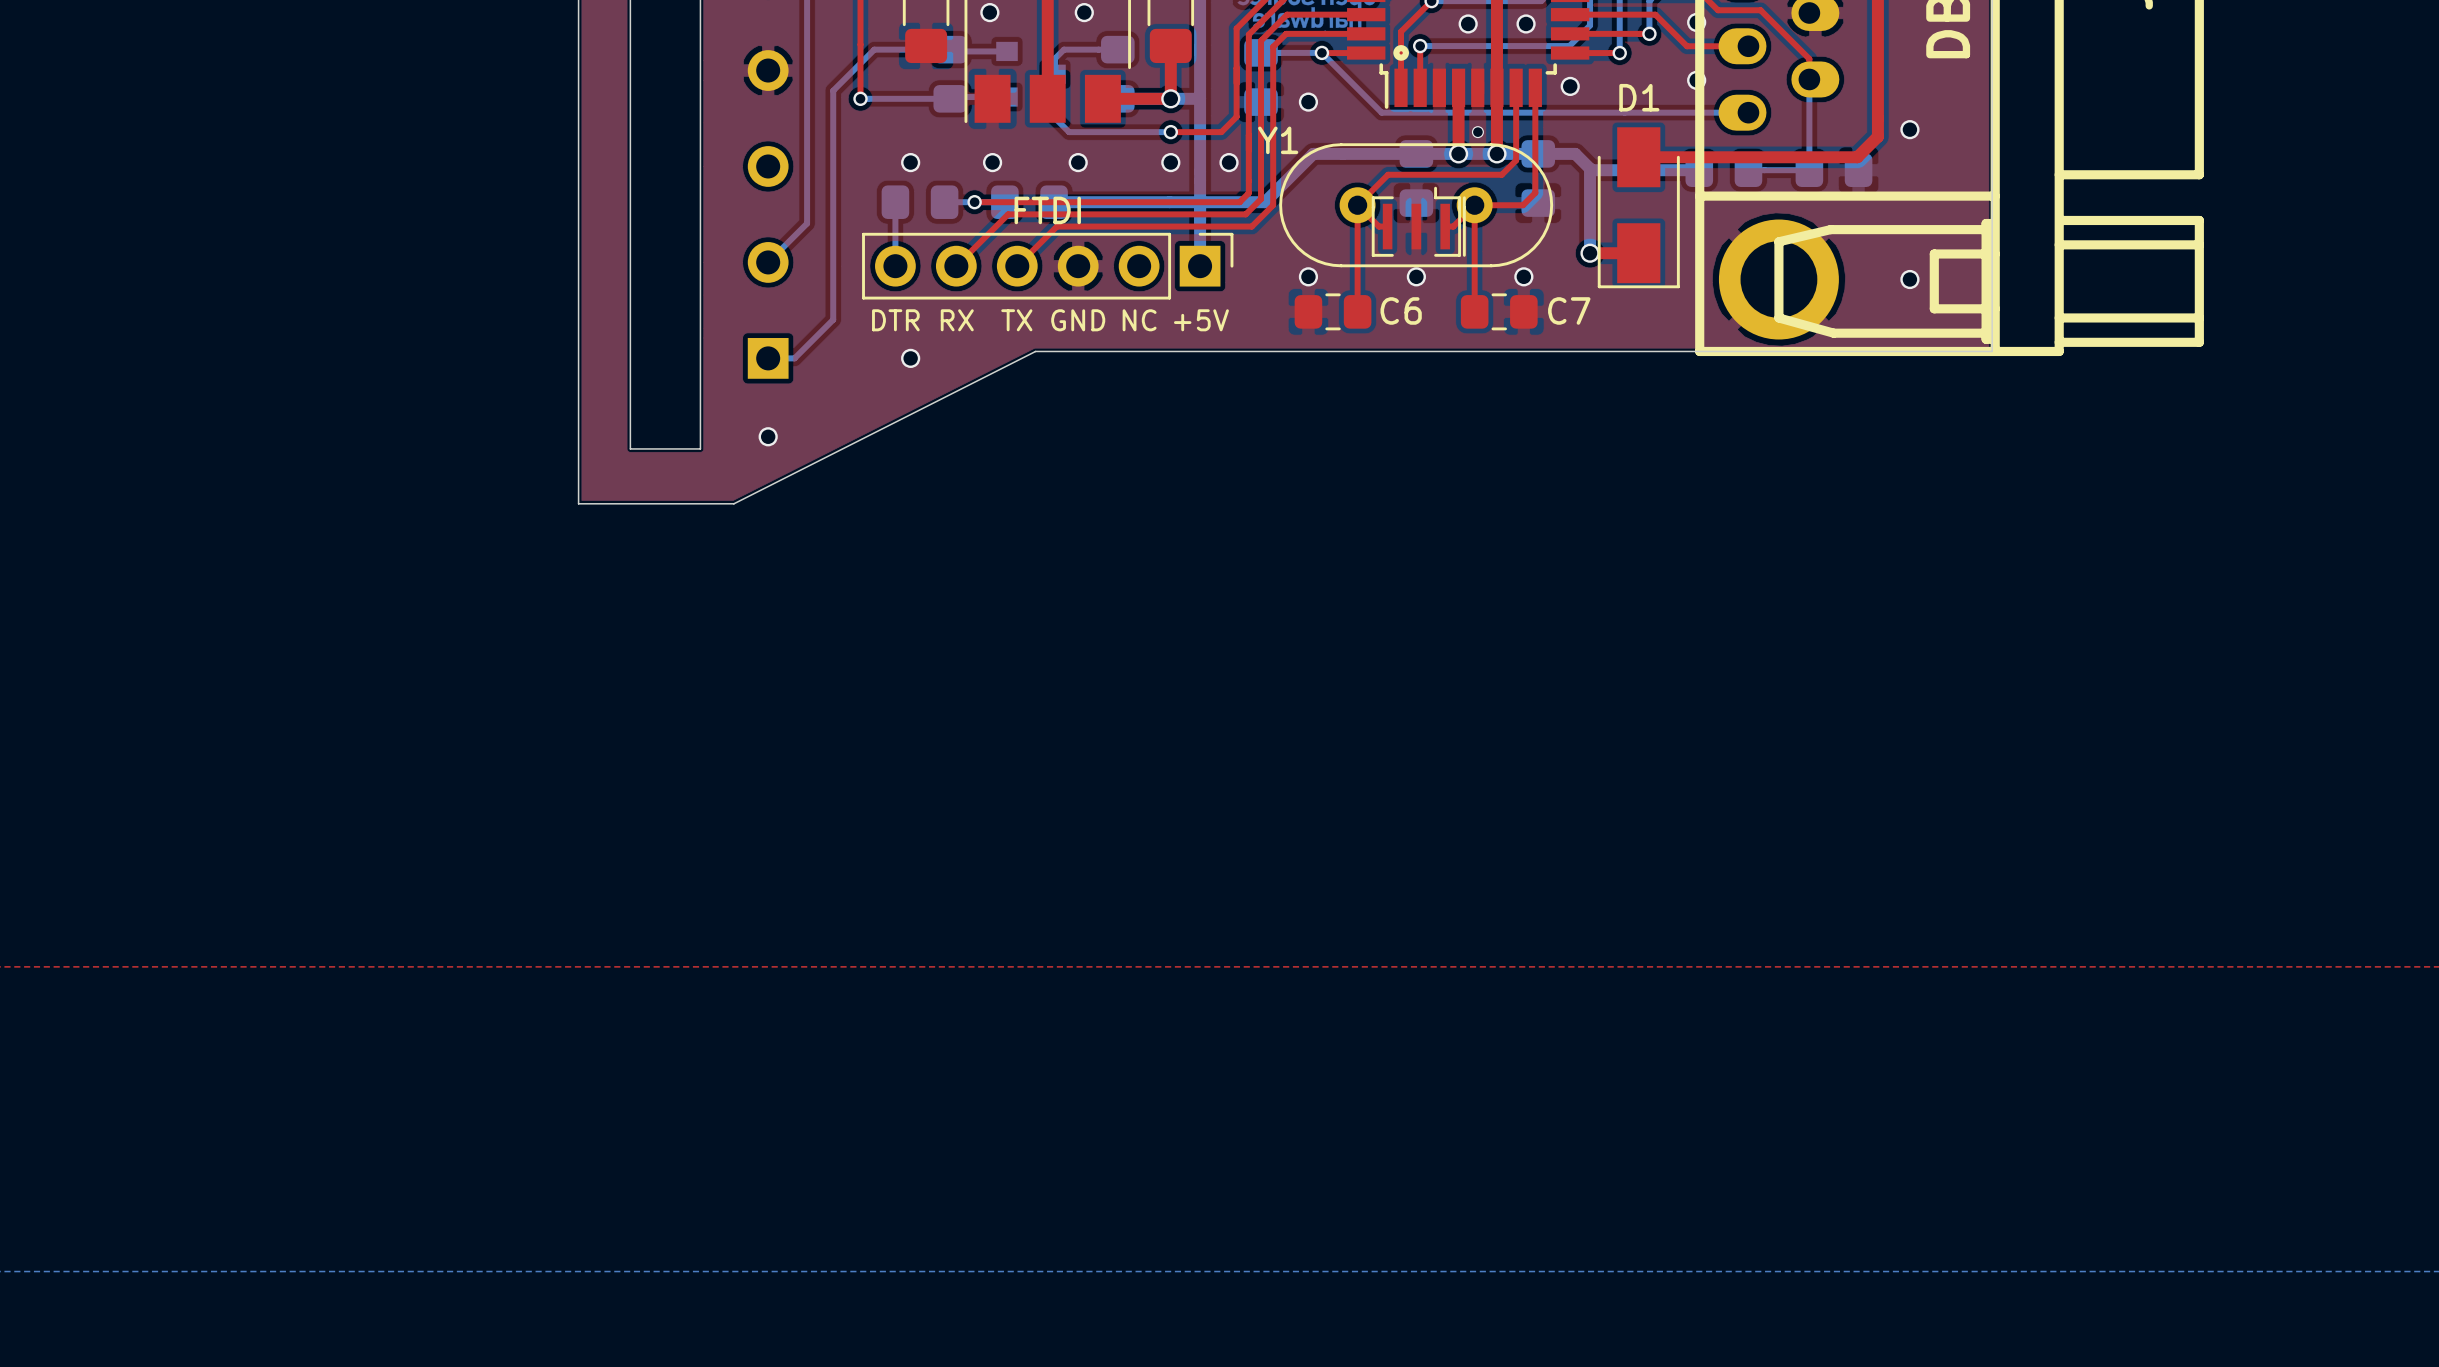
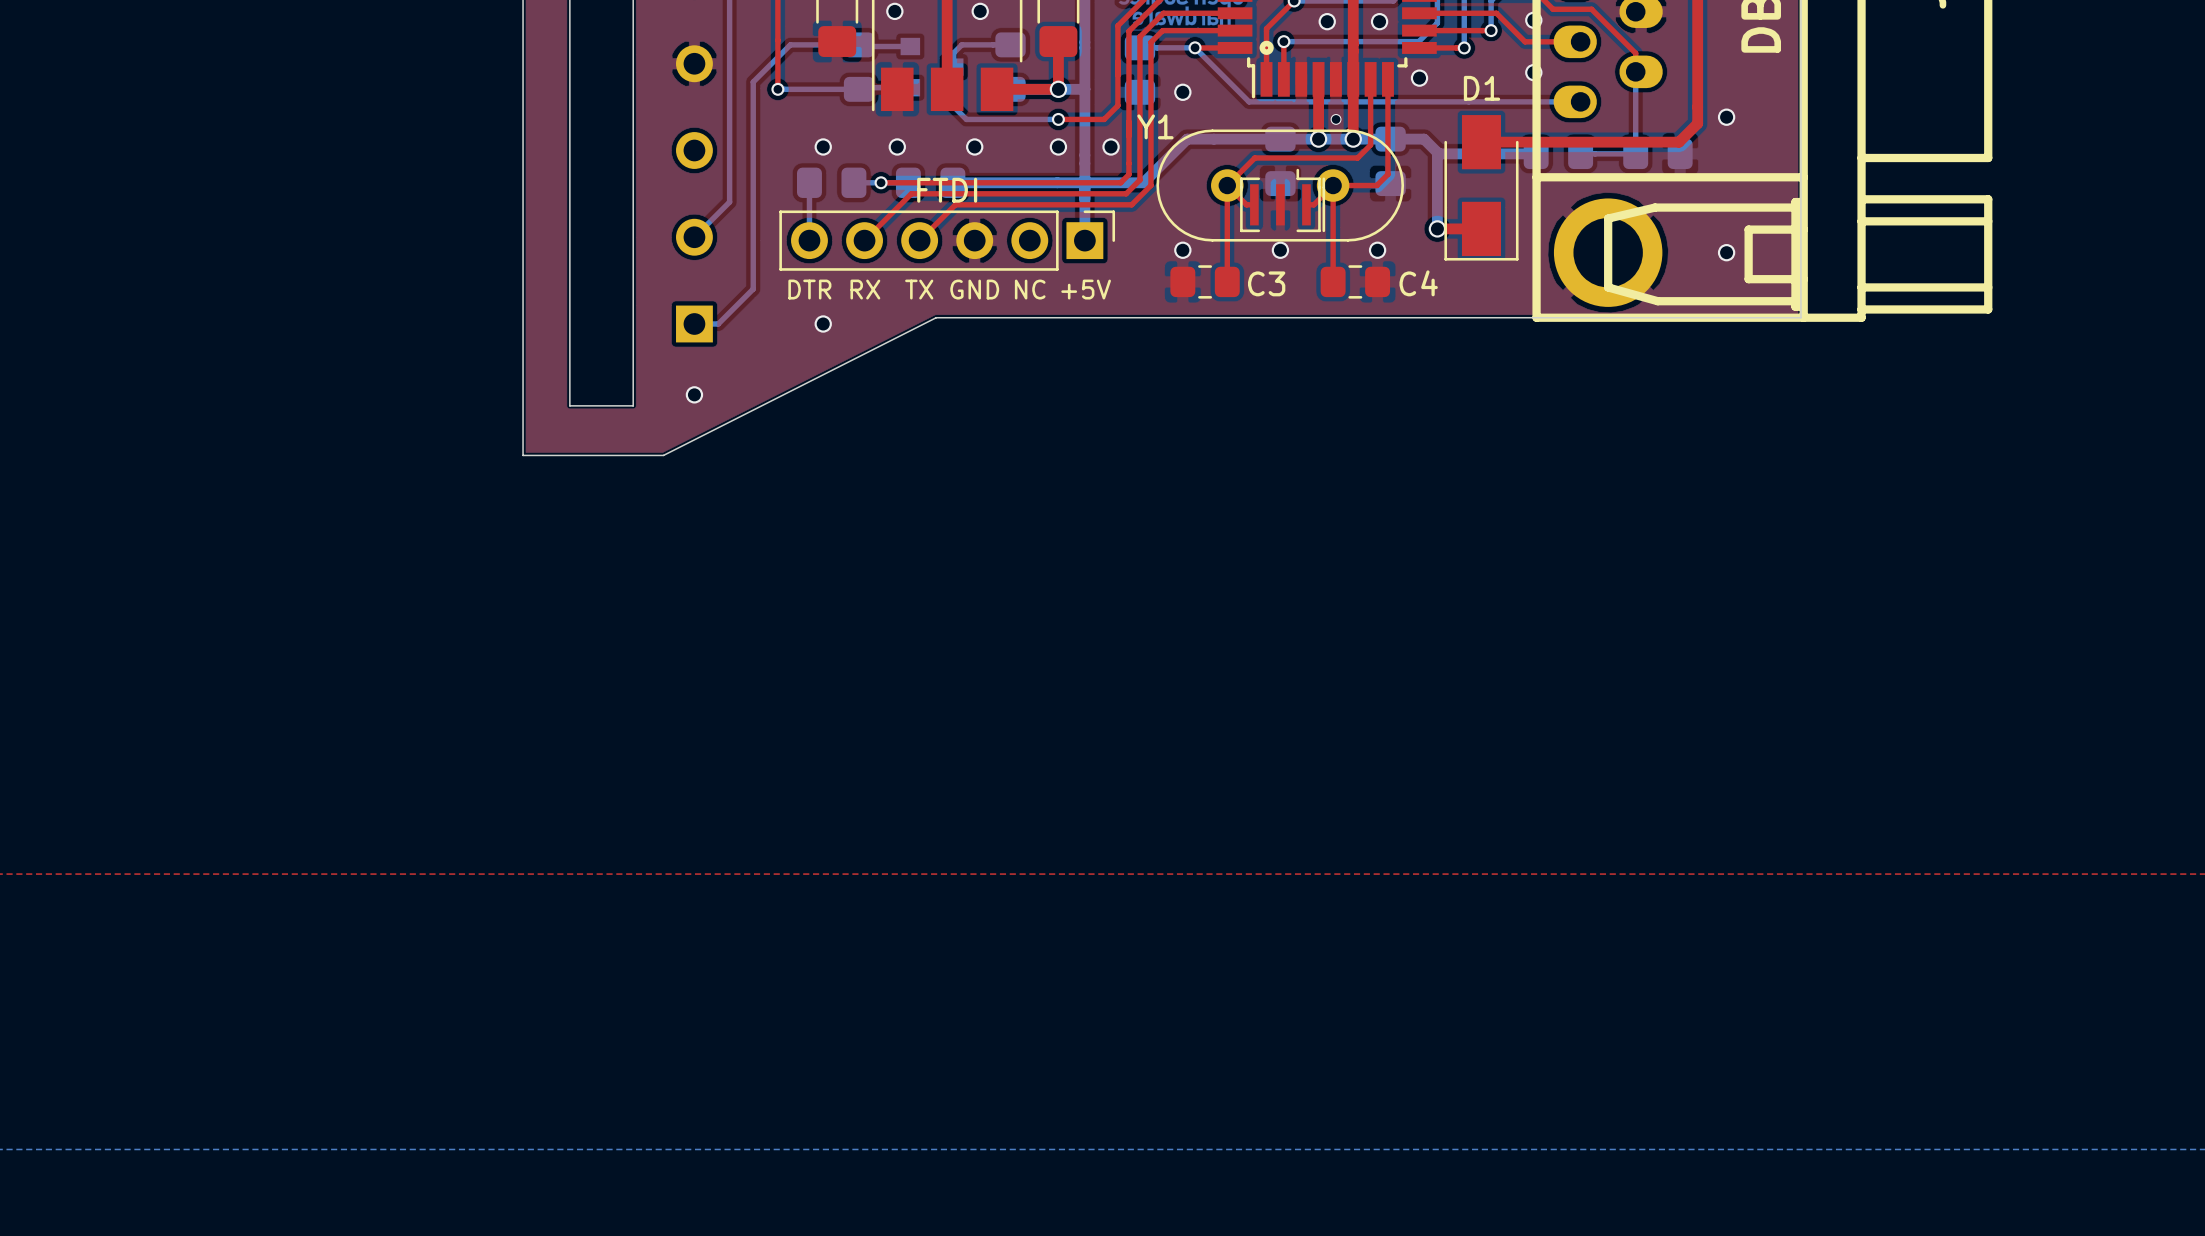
C6 name: C6 (1401, 310) -> C3 (1266, 283)
C7 name: C7 (1569, 310) -> C4 (1418, 283)

